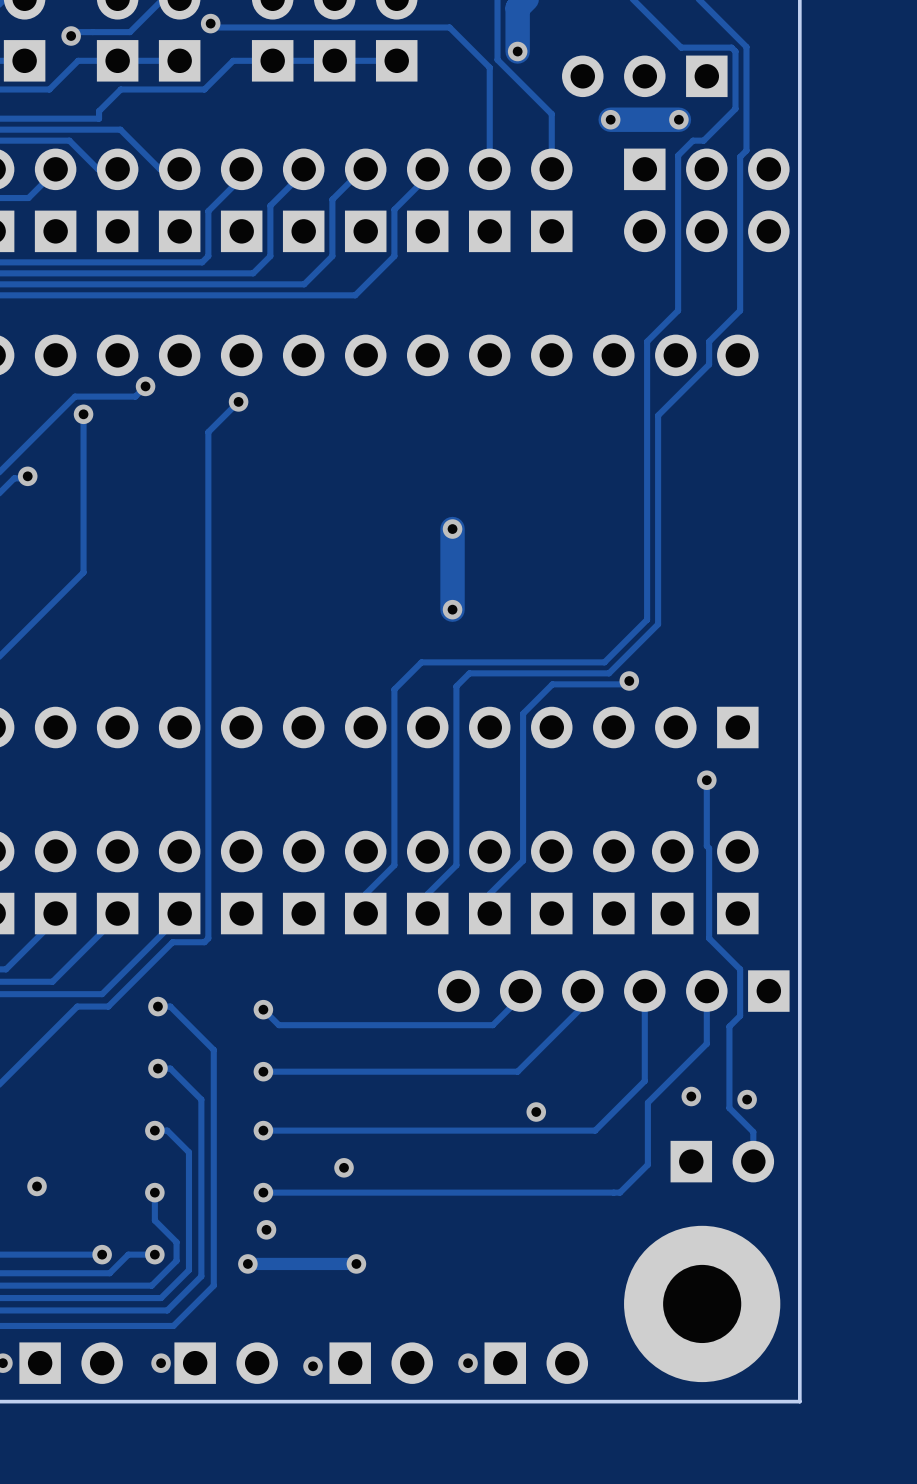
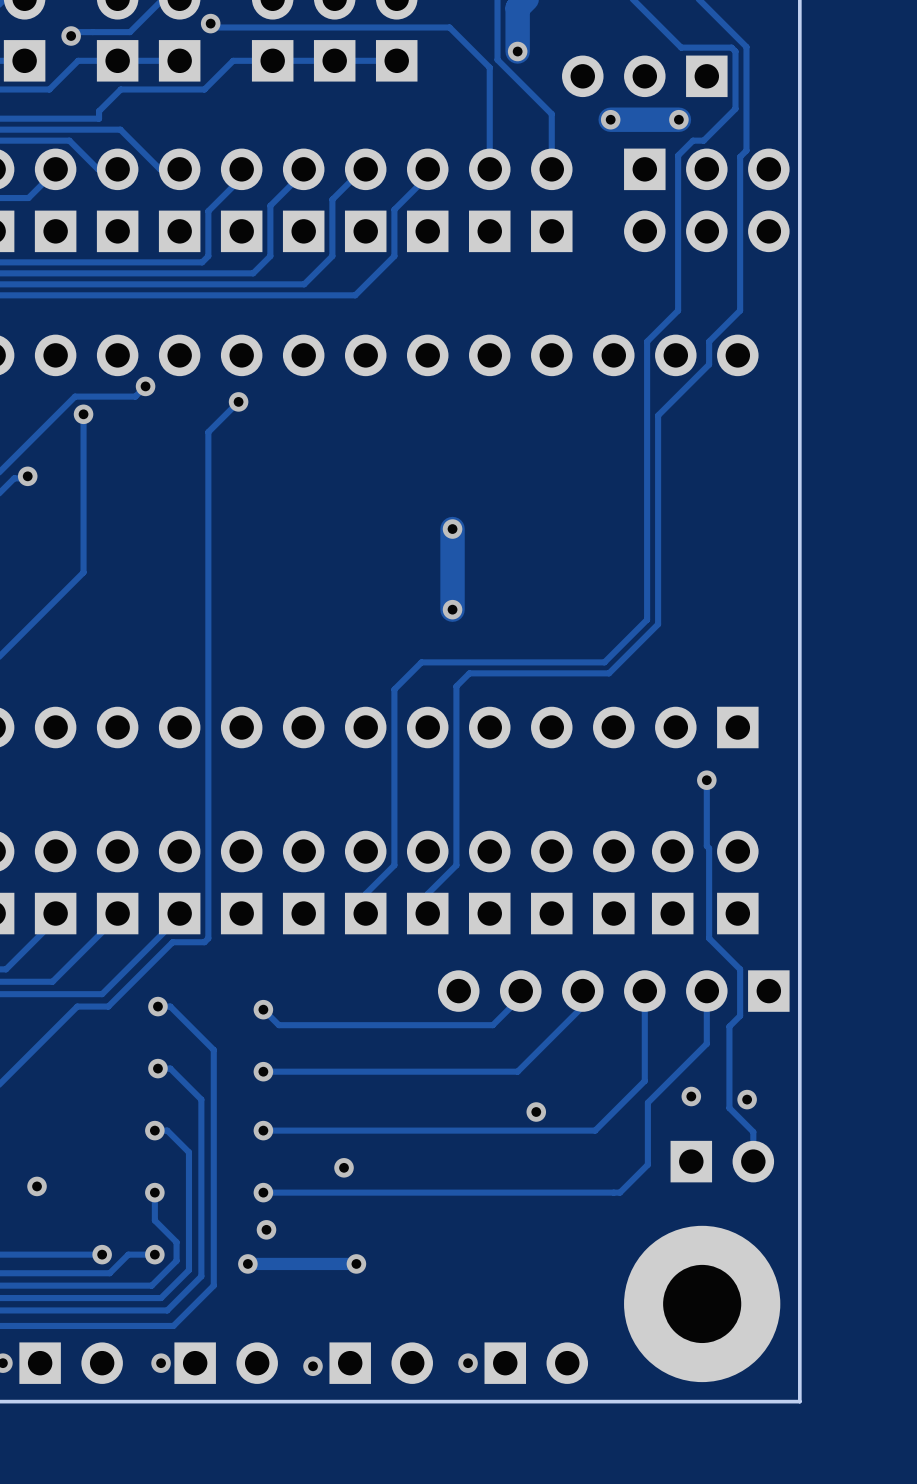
track: (629, 680) (625, 684) (552, 684) (523, 713) (523, 860) (489, 893) (489, 913) -> none
via: (629, 680) -> none

